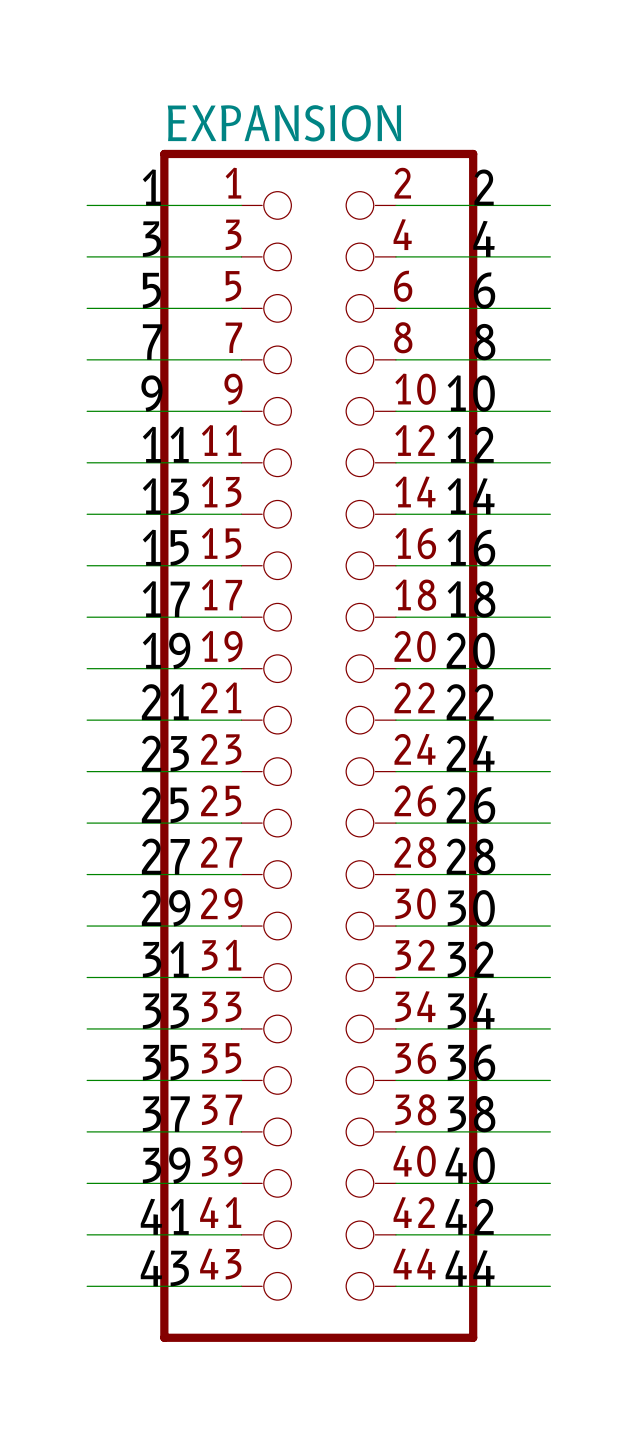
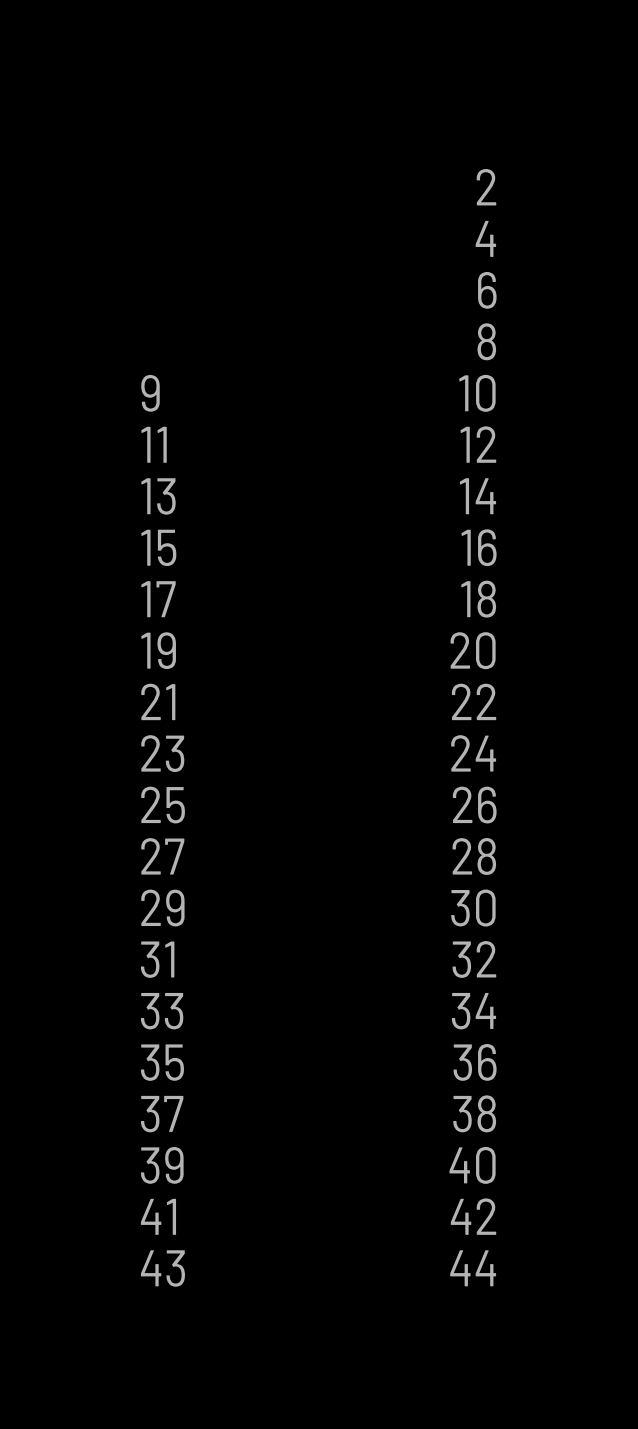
label: 1 (151, 187) -> none
wire: (87, 205) (241, 205) -> none
wire: (395, 205) (550, 205) -> none
label: 3 (152, 239) -> none
wire: (87, 256) (241, 256) -> none
wire: (395, 256) (550, 256) -> none
label: 5 (151, 290) -> none
wire: (87, 308) (241, 308) -> none
wire: (395, 308) (550, 308) -> none
label: 7 (152, 342) -> none
wire: (87, 359) (241, 359) -> none
wire: (395, 359) (550, 359) -> none
wire: (87, 411) (241, 411) -> none
wire: (395, 411) (550, 411) -> none
wire: (87, 462) (241, 462) -> none
wire: (395, 462) (550, 462) -> none
wire: (87, 514) (241, 514) -> none
wire: (395, 514) (550, 514) -> none
wire: (87, 565) (241, 565) -> none
wire: (395, 565) (550, 565) -> none
wire: (87, 617) (241, 617) -> none
wire: (395, 617) (550, 617) -> none
wire: (87, 668) (241, 668) -> none
wire: (395, 668) (550, 668) -> none
wire: (87, 720) (241, 720) -> none
wire: (395, 720) (550, 720) -> none
EXPANSION: (318, 745) -> none
wire: (87, 771) (241, 771) -> none
wire: (395, 771) (550, 771) -> none
wire: (87, 823) (241, 823) -> none
wire: (395, 823) (550, 823) -> none
wire: (87, 874) (241, 874) -> none
wire: (395, 874) (550, 874) -> none
wire: (87, 926) (241, 926) -> none
wire: (395, 926) (550, 926) -> none
wire: (87, 977) (241, 977) -> none
wire: (395, 977) (550, 977) -> none
wire: (87, 1028) (241, 1028) -> none
wire: (395, 1028) (550, 1028) -> none
wire: (87, 1080) (241, 1080) -> none
wire: (395, 1080) (550, 1080) -> none
wire: (87, 1131) (241, 1131) -> none
wire: (395, 1131) (550, 1131) -> none
wire: (87, 1183) (241, 1183) -> none
wire: (395, 1183) (550, 1183) -> none
wire: (87, 1234) (241, 1234) -> none
wire: (395, 1234) (550, 1234) -> none
wire: (87, 1286) (241, 1286) -> none
wire: (395, 1286) (550, 1286) -> none

